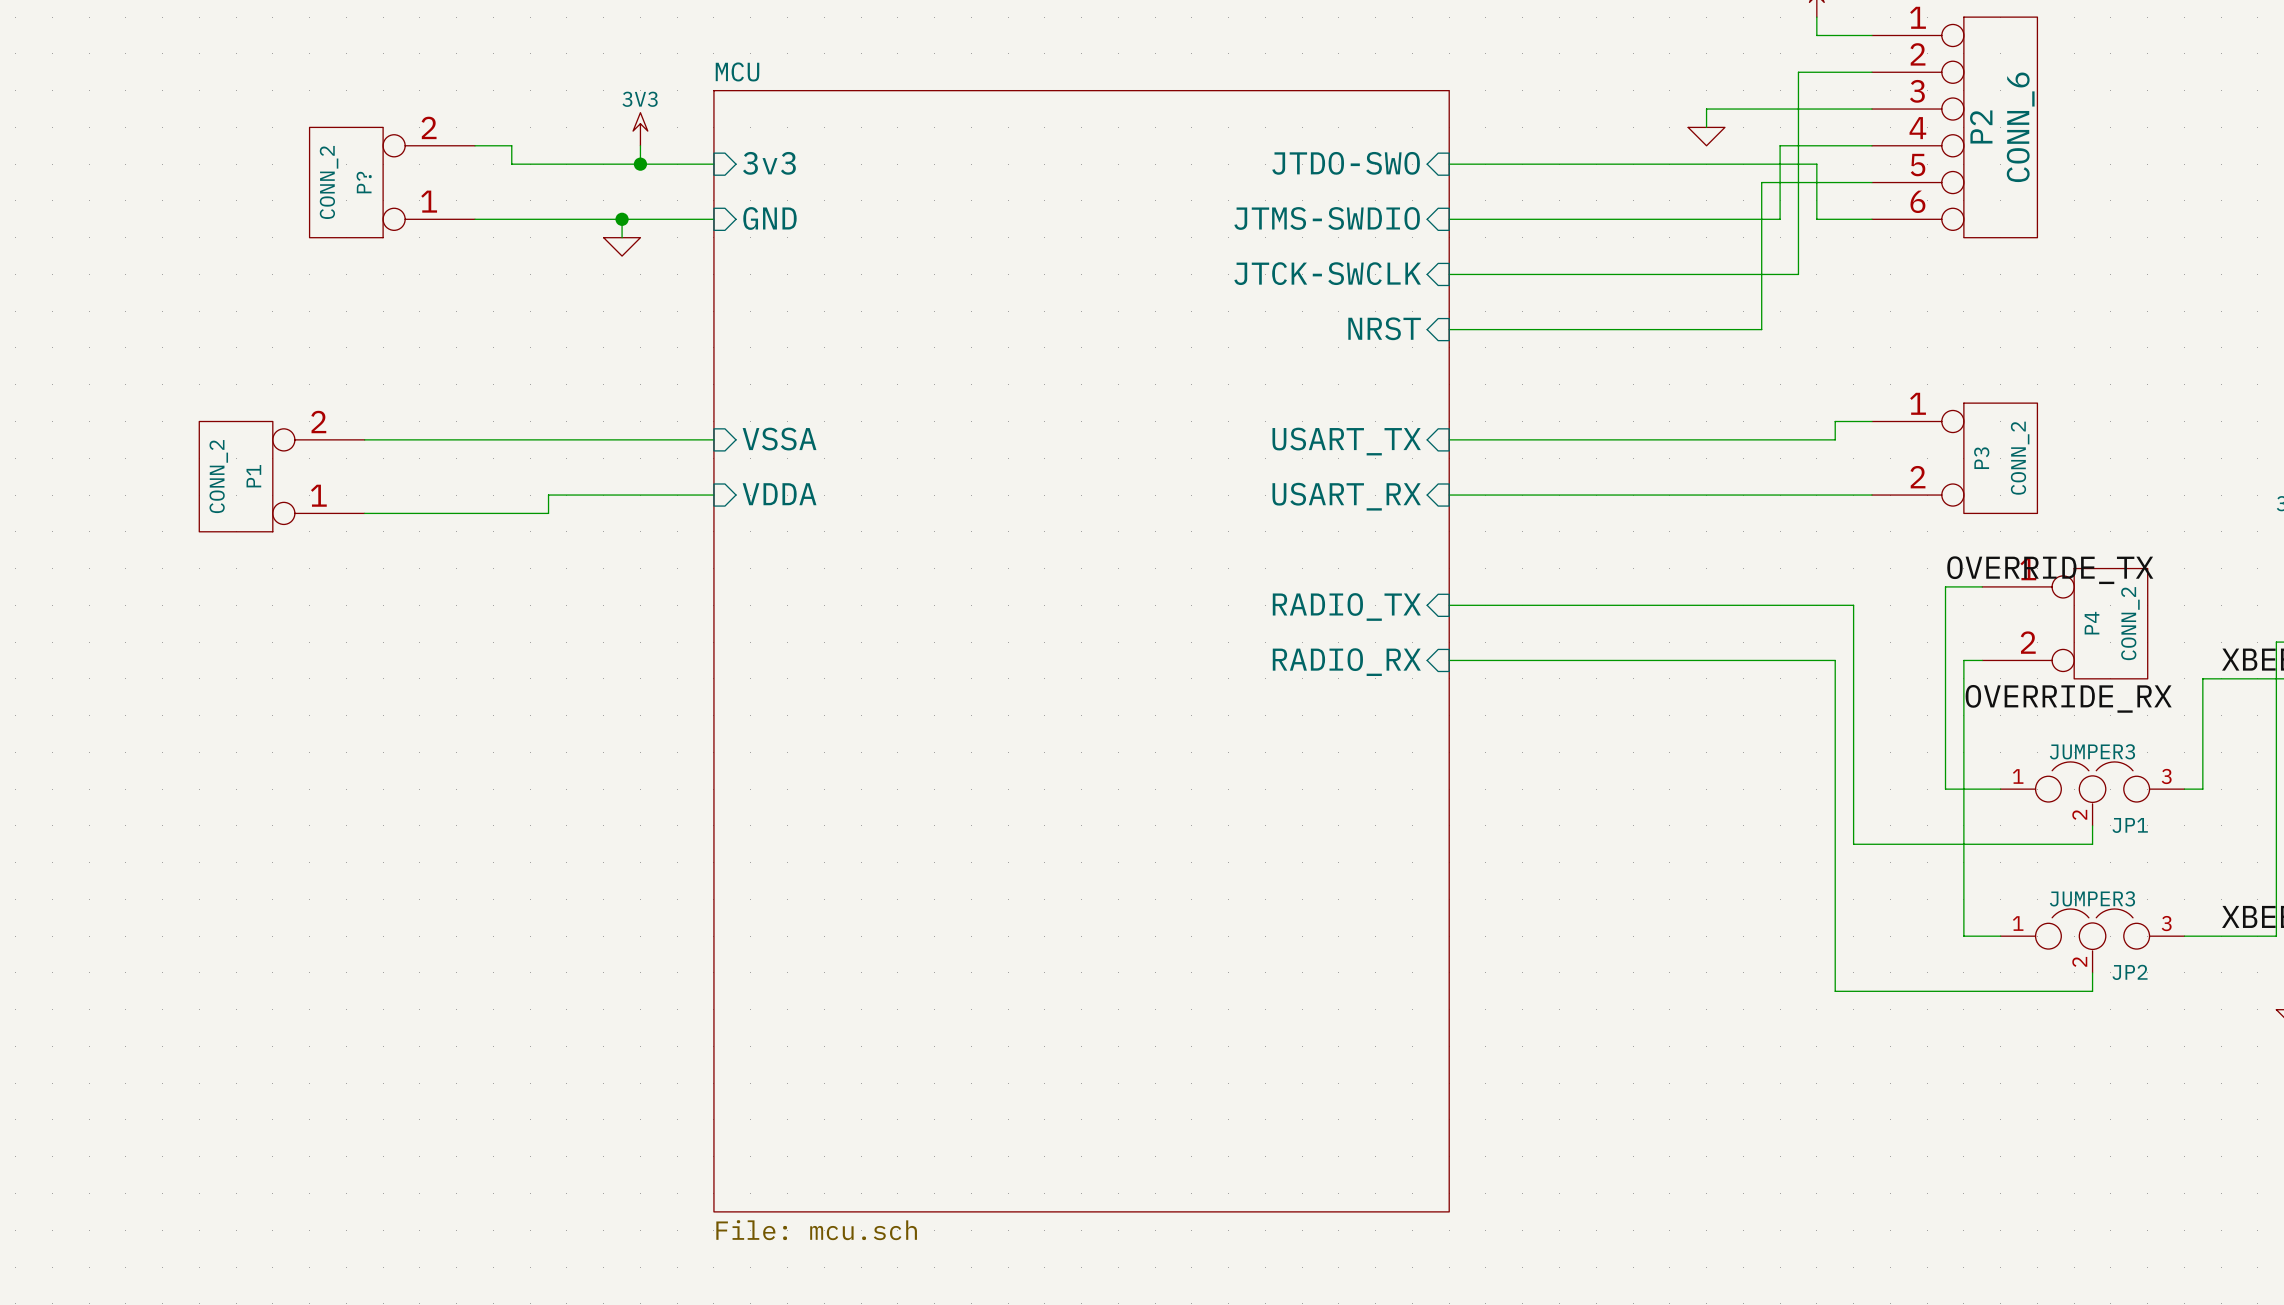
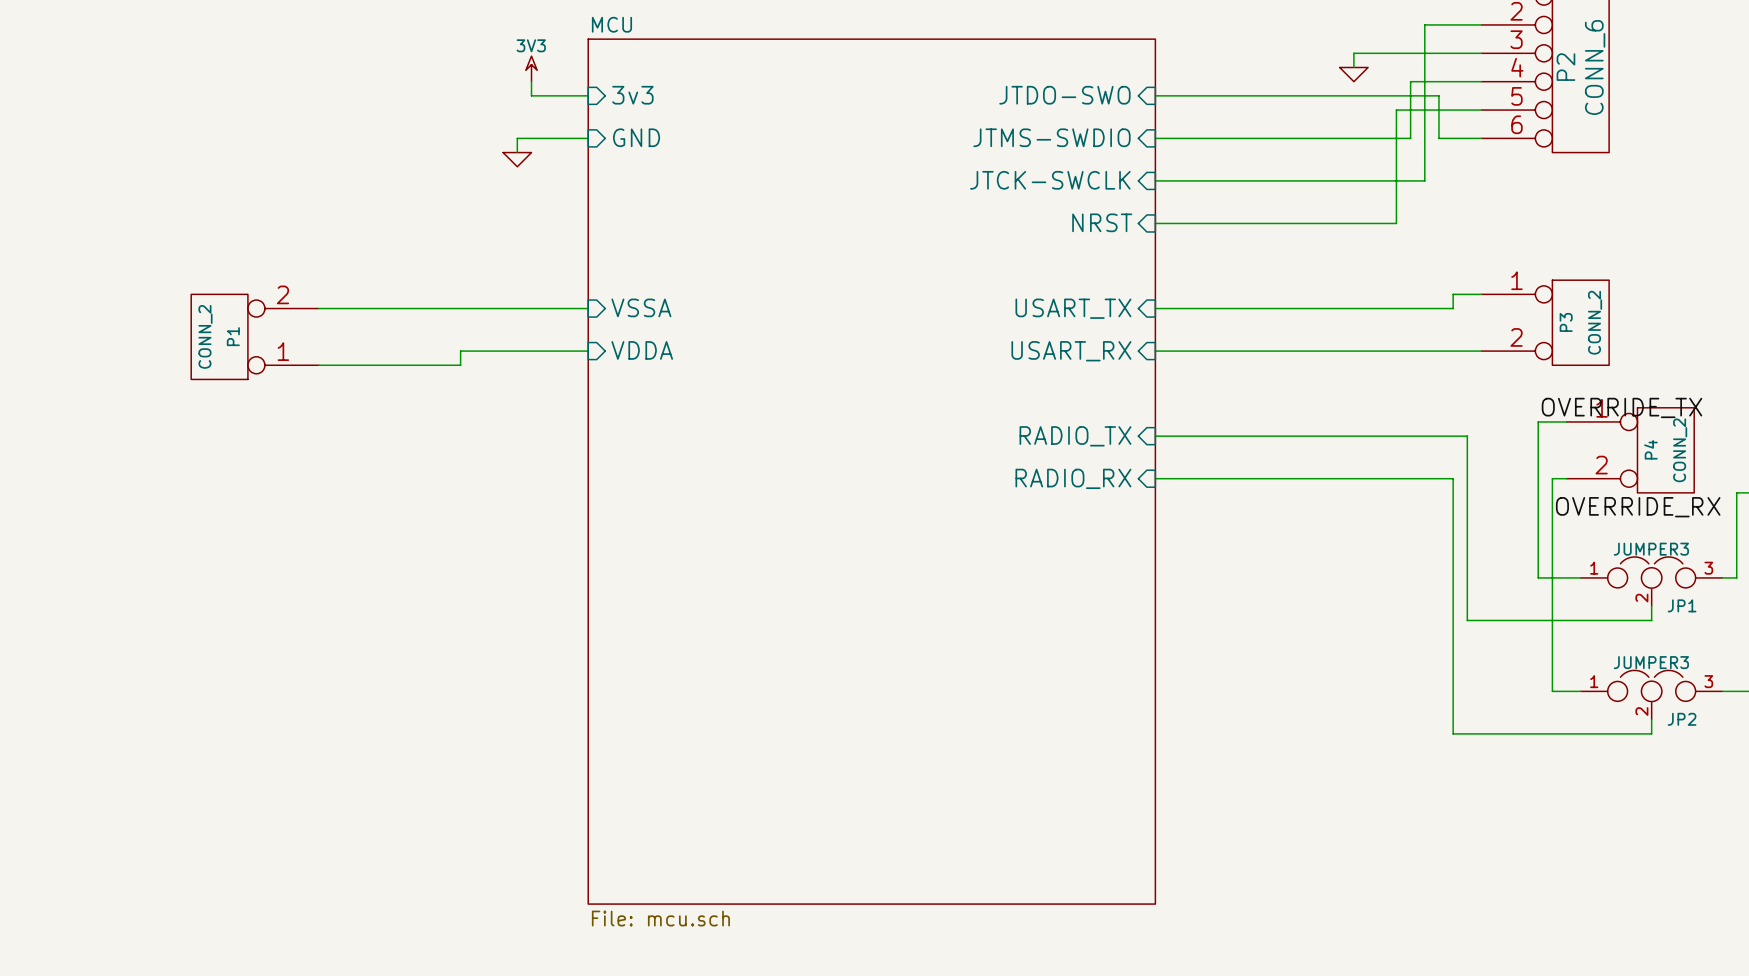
wire: (475, 145) (511, 145) (511, 164) (640, 164) -> none
junction: (640, 164) -> none
P?: CONN_2 (392, 182) -> none
wire: (475, 219) (622, 219) -> none
junction: (622, 219) -> none

